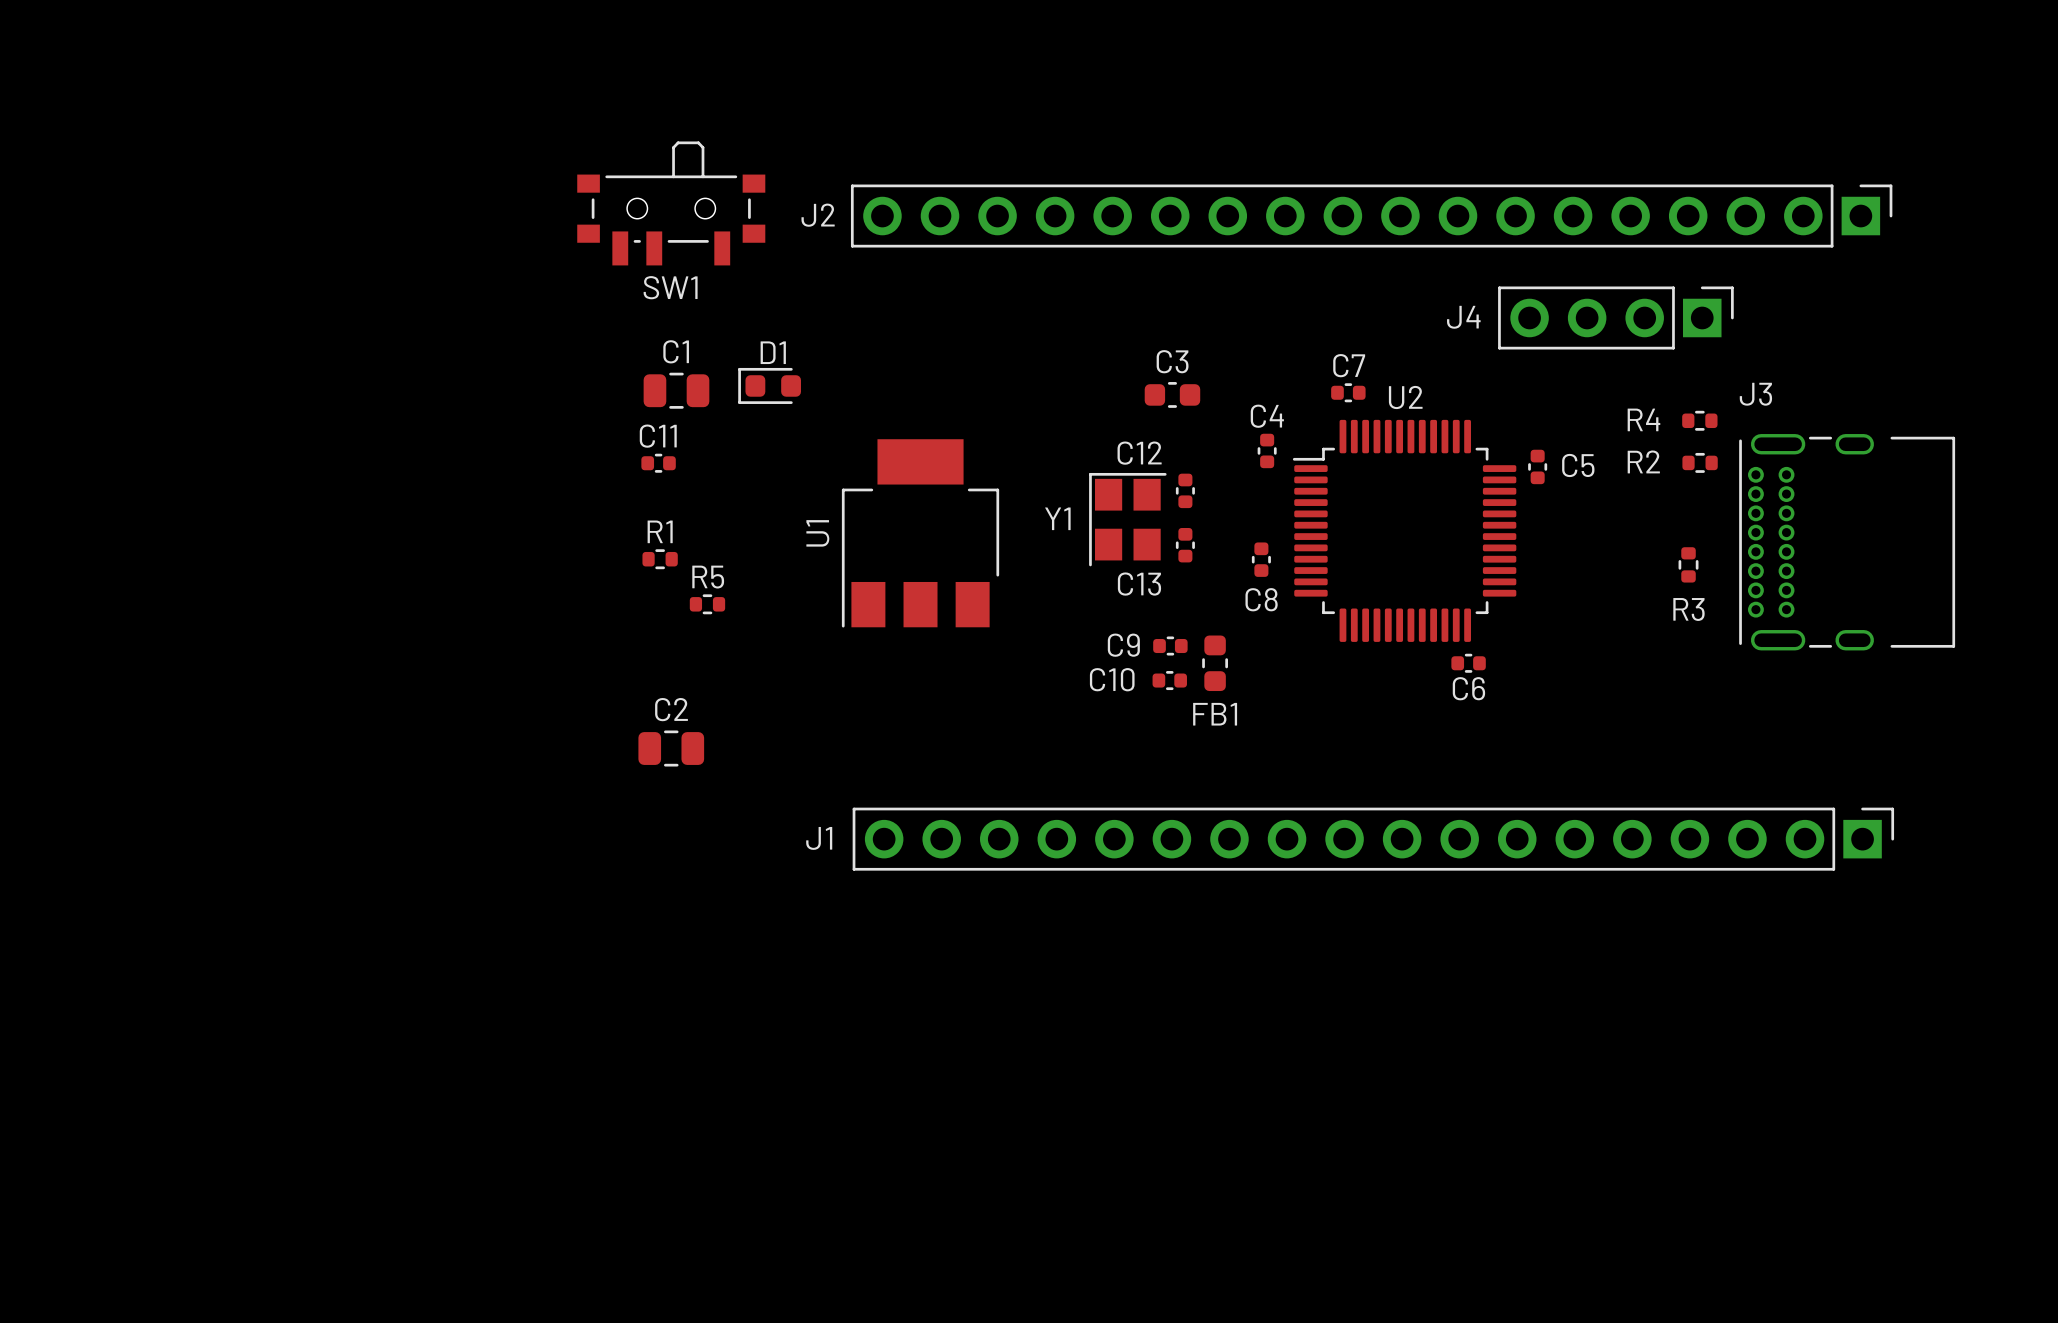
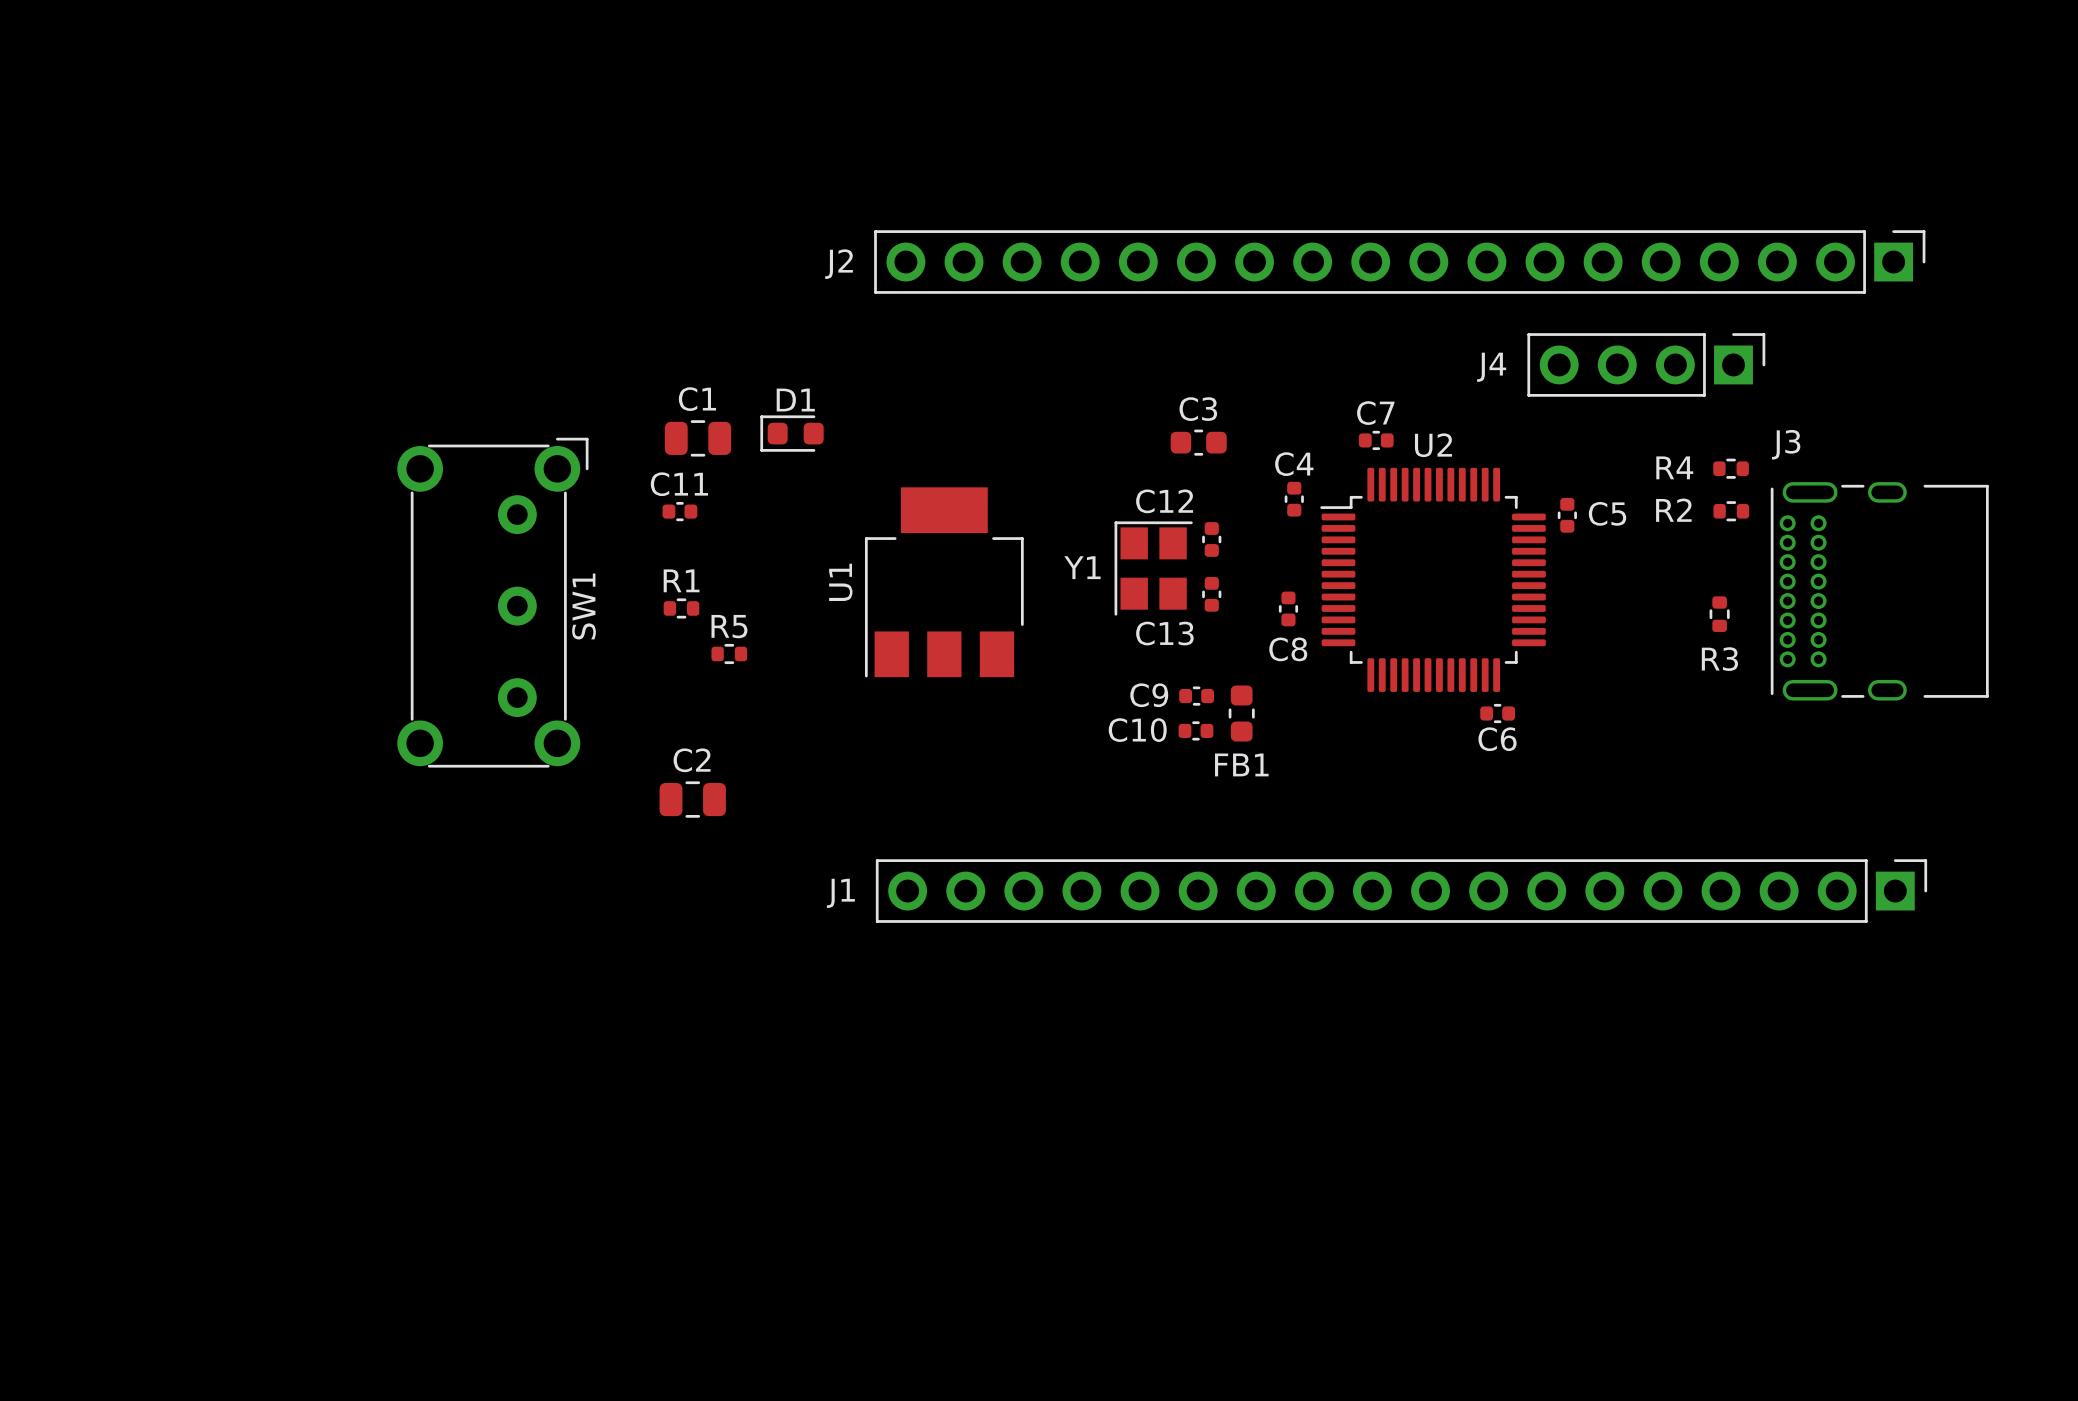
SW1 footprint: [577, 141, 766, 266] -> [397, 437, 589, 768]
SW1 name position: SW1 (670, 287) -> SW1 (584, 606)

